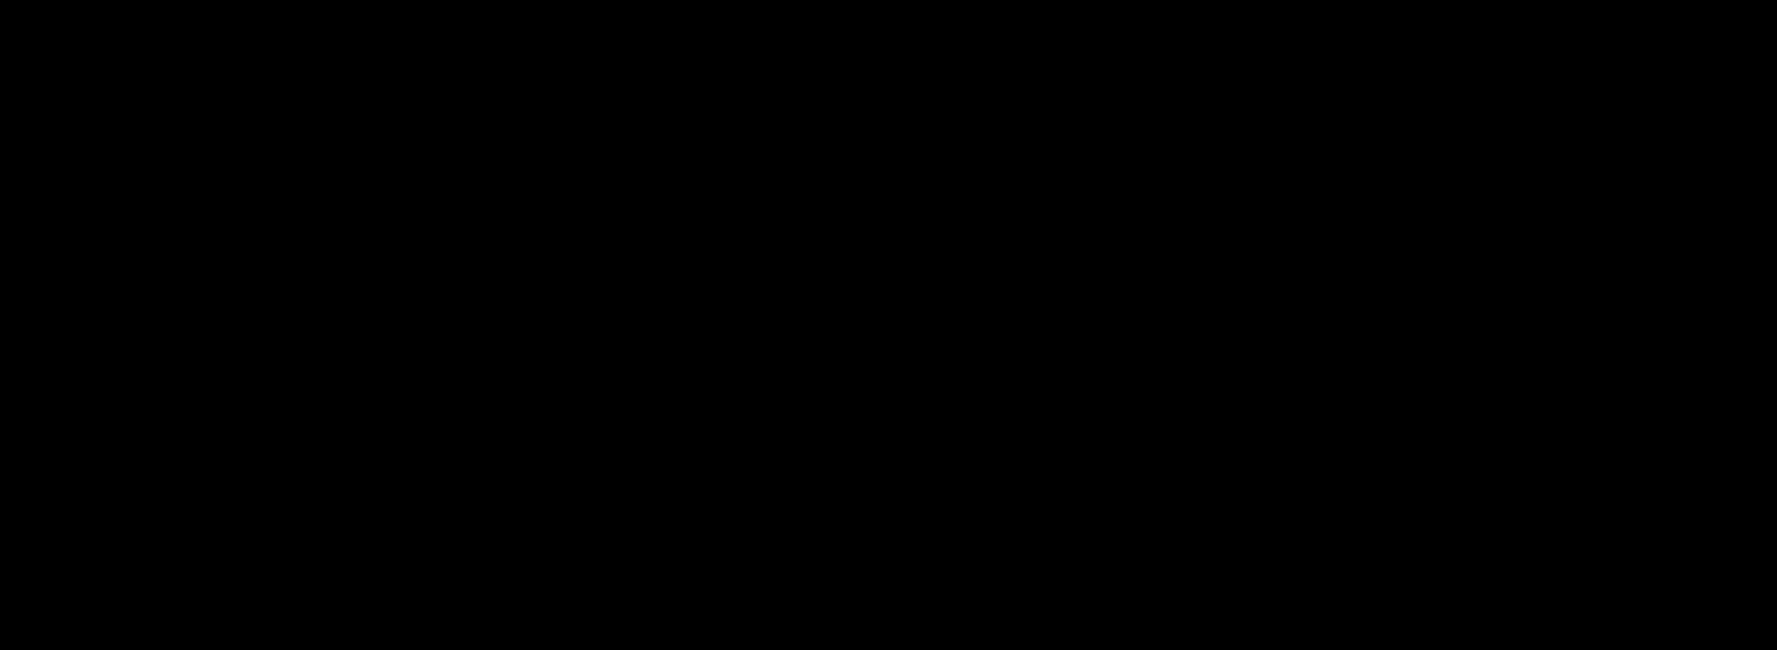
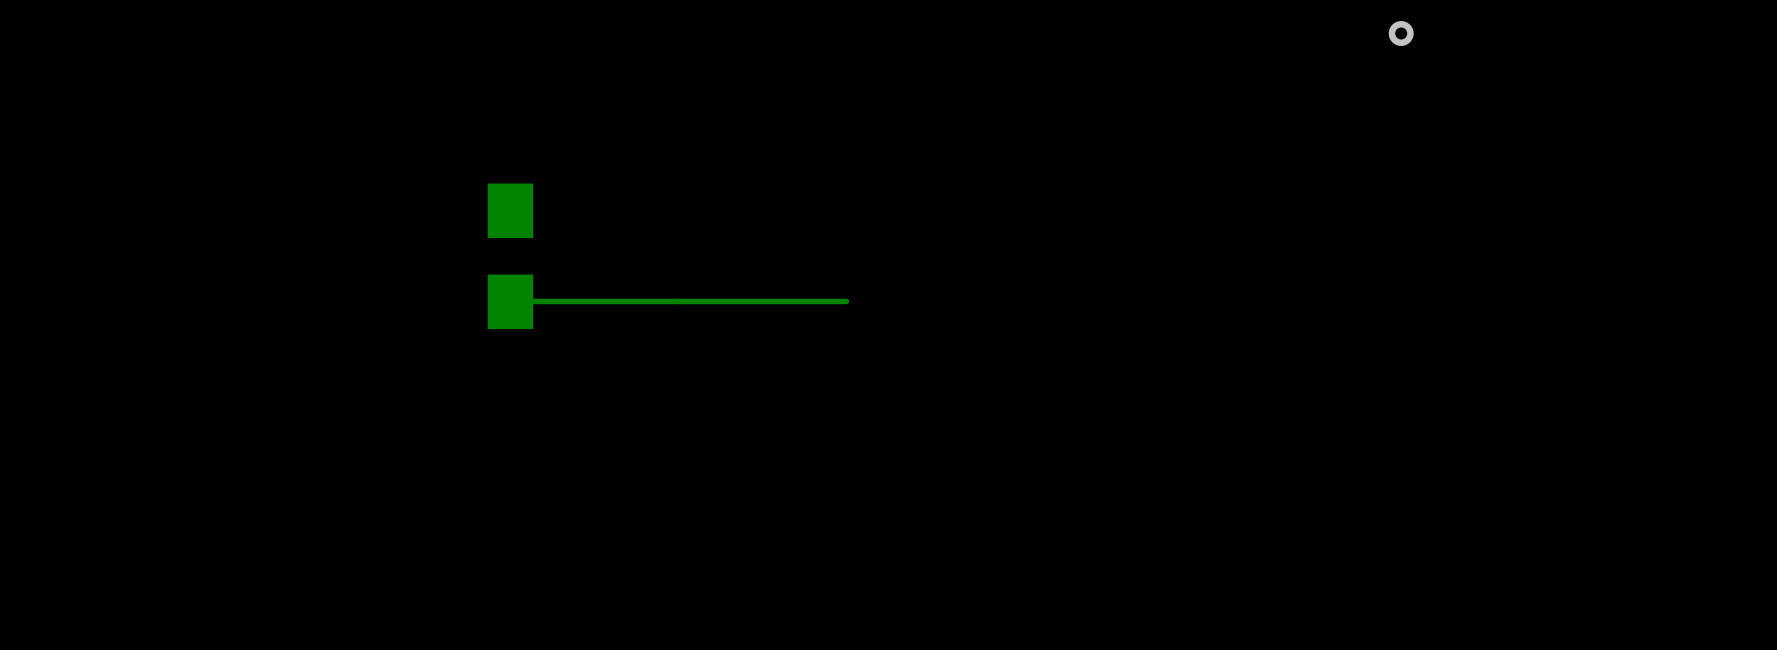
via: none -> (1401, 33)
part: none -> (510, 256)
bottom track: none -> (510, 301) (846, 301)

